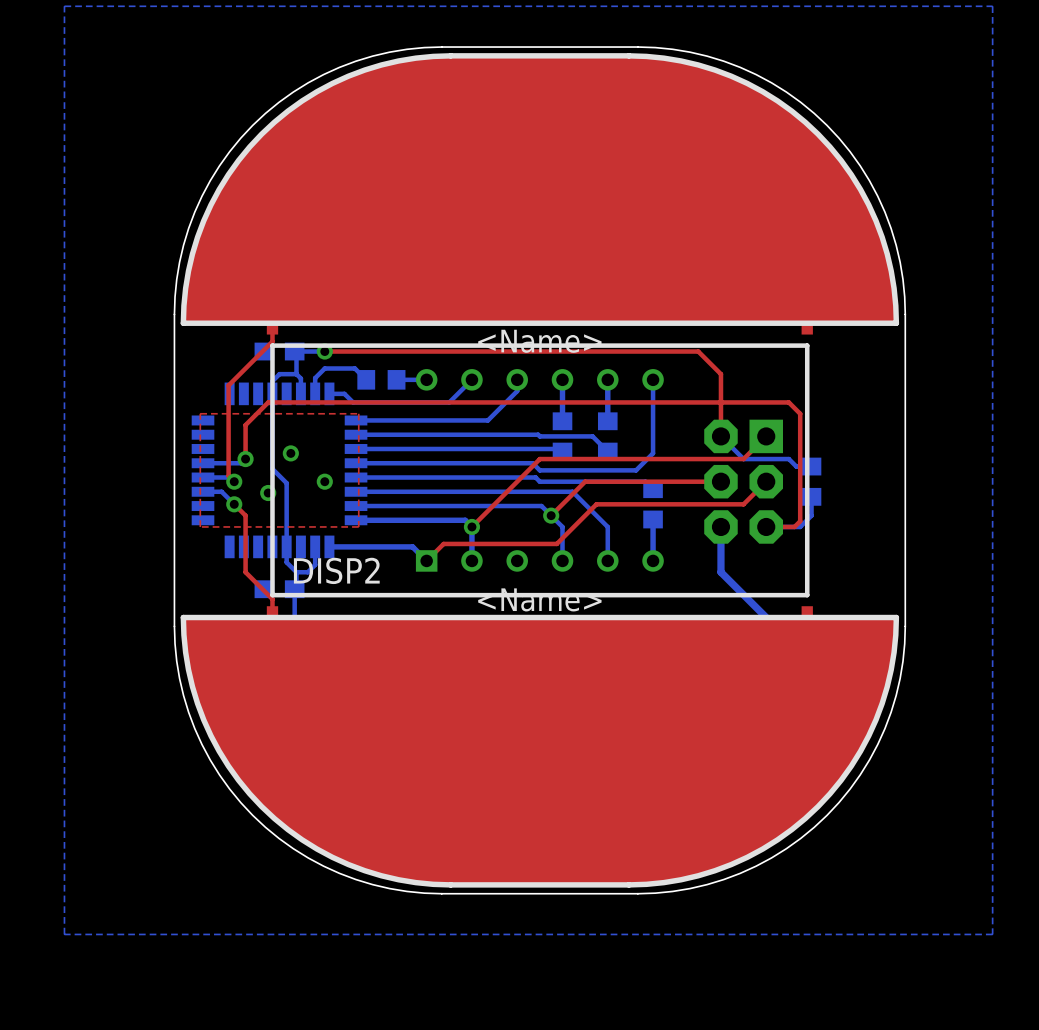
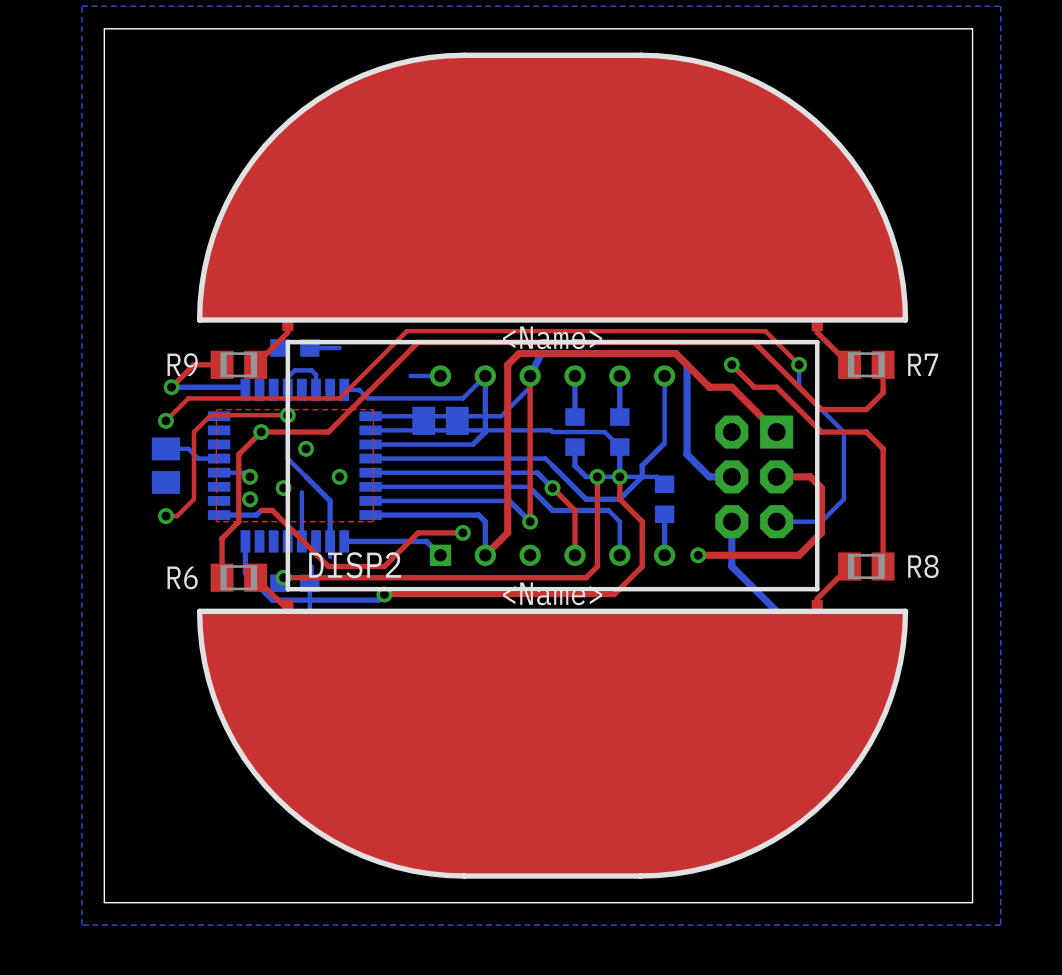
board edge: (441, 47) (655, 47) (690, 52) (740, 67) (786, 92) (814, 113) (838, 138) (869, 180) (891, 228) (903, 279) (905, 314) (905, 626) (903, 661) (896, 695) (884, 728) (869, 760) (838, 802) (814, 827) (786, 848) (756, 866) (723, 879) (672, 891) (637, 893) (424, 893) (389, 888) (355, 879) (308, 857) (279, 838) (252, 815) (229, 789) (210, 760) (188, 712) (179, 678) (175, 643) (174, 314) (179, 262) (194, 212) (210, 180) (240, 138) (265, 113) (293, 92) (323, 74) (355, 61) (406, 49) (441, 47) -> (104, 28) (104, 902) (972, 902) (972, 28) (104, 28)
top track: none -> (817, 319) (817, 332) (849, 364)
top track: (272, 335) (272, 341) (228, 385) (228, 476) (234, 481) -> (287, 332) (255, 364)
bottom track: (294, 351) (296, 351) (296, 374) -> none
top track: (324, 351) (698, 351) (720, 374) (720, 436) -> none
via: (324, 351) -> none
top track: none -> (222, 364) (193, 364) (171, 387)
R9: none -> (238, 364)
top track: none -> (731, 364) (754, 387) (776, 387) (821, 432) (866, 432) (883, 448) (883, 566)
via: none -> (731, 364)
via: none -> (799, 364)
R7: none -> (866, 364)
top track: none -> (883, 364) (883, 392) (866, 409) (821, 409) (754, 342) (418, 342) (328, 432) (261, 432) (238, 454) (238, 521) (222, 538) (222, 577)
bottom track: (366, 379) (354, 368) (324, 368) (315, 378) (315, 393) -> none
part: (381, 379) -> none
bottom track: none -> (530, 376) (541, 353) (675, 353) (687, 364) (687, 454) (709, 476) (731, 476)
top track: none -> (530, 376) (530, 521)
bottom track: none -> (171, 387) (242, 387) (245, 389)
via: none -> (171, 387)
top track: (268, 402) (245, 425) (245, 459) -> (283, 398) (188, 398) (165, 420)
top track: (324, 402) (788, 402) (800, 413) (800, 521) (794, 526) (766, 526) -> (339, 398) (406, 331) (765, 331) (799, 364)
top track: none -> (287, 415) (210, 415) (193, 432) (193, 499) (177, 516) (165, 516)
via: none -> (287, 415)
via: none -> (165, 420)
part: none -> (440, 420)
bottom track: (720, 436) (743, 459) (788, 459) (796, 466) (811, 466) -> none
top track: (766, 436) (743, 459) (539, 459) (471, 526) -> (776, 432) (731, 387) (709, 387) (675, 353) (518, 353) (507, 364) (507, 532) (485, 555)
bottom track: (653, 447) (653, 453) (636, 470) (539, 470) -> (664, 443) (642, 465) (642, 476) (619, 499) (586, 499) (552, 465)
bottom track: (459, 448) (559, 448) (562, 451) -> (472, 444) (485, 432) (485, 376)
bottom track: none -> (574, 448) (574, 465) (586, 476)
bottom track: none -> (619, 448) (619, 476)
bottom track: (245, 459) (241, 463) (203, 463) -> (166, 448) (188, 448) (198, 458) (219, 458)
via position: (245, 459) -> (261, 432)
bottom track: (272, 463) (272, 468) (286, 483) (286, 497) -> (287, 458) (330, 500) (330, 541)
part: none -> (165, 465)
bottom track: (524, 477) (535, 477) (539, 481) (573, 481) -> (537, 472) (552, 488)
top track: none -> (597, 476) (597, 566) (586, 577) (283, 577)
via: none -> (597, 476)
top track: none -> (619, 476) (619, 499) (642, 521) (642, 566) (614, 594) (384, 594)
via: none -> (619, 476)
top track: (720, 481) (585, 481) (551, 515) -> none
top track: (766, 481) (743, 504) (596, 504) (556, 543) (443, 543) (426, 560) -> (776, 476) (810, 476) (821, 488) (821, 532) (799, 555) (698, 555)
part: (811, 481) -> none
bottom track: (203, 491) (221, 491) (234, 504) -> none
bottom track: (515, 491) (572, 491) (596, 515) -> (528, 486) (552, 510) (608, 510)
top track: none -> (552, 488) (574, 510) (574, 555)
via: none -> (552, 488)
bottom track: (811, 496) (811, 515) (800, 526) -> (799, 364) (799, 387) (843, 432) (843, 499) (821, 521) (810, 521)
top track: (234, 504) (245, 515) (245, 572) (272, 599) (272, 616) -> (255, 577) (287, 610)
bottom track: (496, 506) (541, 506) (562, 526) (562, 560) -> (509, 500) (530, 521)
bottom track: none -> (261, 510) (256, 515) (219, 515)
top track: none -> (261, 510) (272, 510) (328, 566) (384, 566) (418, 532) (462, 532)
via: (551, 515) -> none
via: none -> (165, 516)
via: (471, 526) -> none
via: none -> (530, 521)
via: none -> (462, 532)
bottom track: none -> (245, 541) (245, 573) (272, 600) (378, 600) (384, 594)
bottom track: (286, 546) (286, 562) (296, 572) (307, 572) (315, 562) -> none
via: none -> (698, 555)
top track: none -> (849, 566) (817, 598) (817, 611)
R8: none -> (866, 566)
R6: none -> (238, 577)
via: none -> (283, 577)
via: none -> (384, 594)

